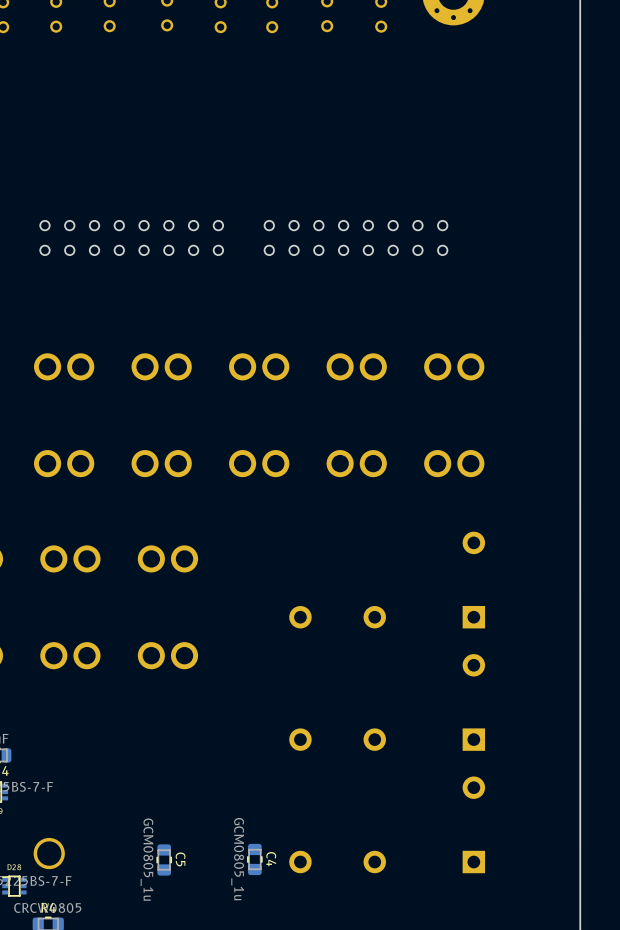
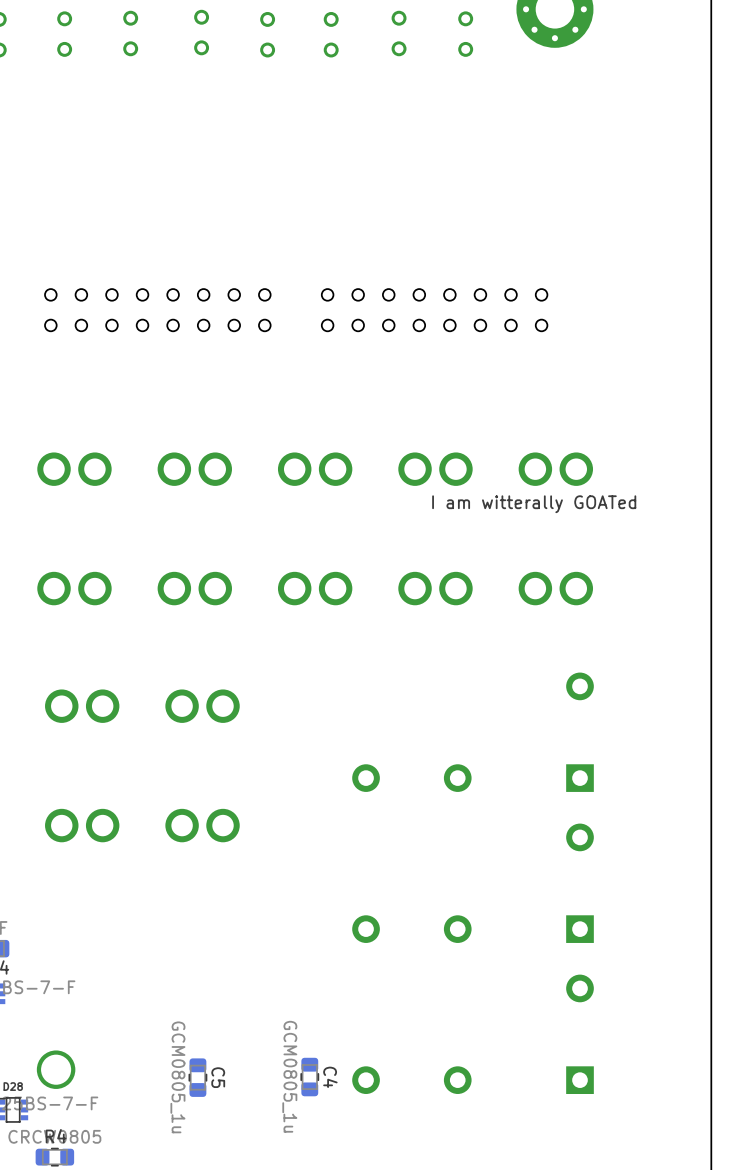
text: none -> I am witterally GOATed (534, 504)

